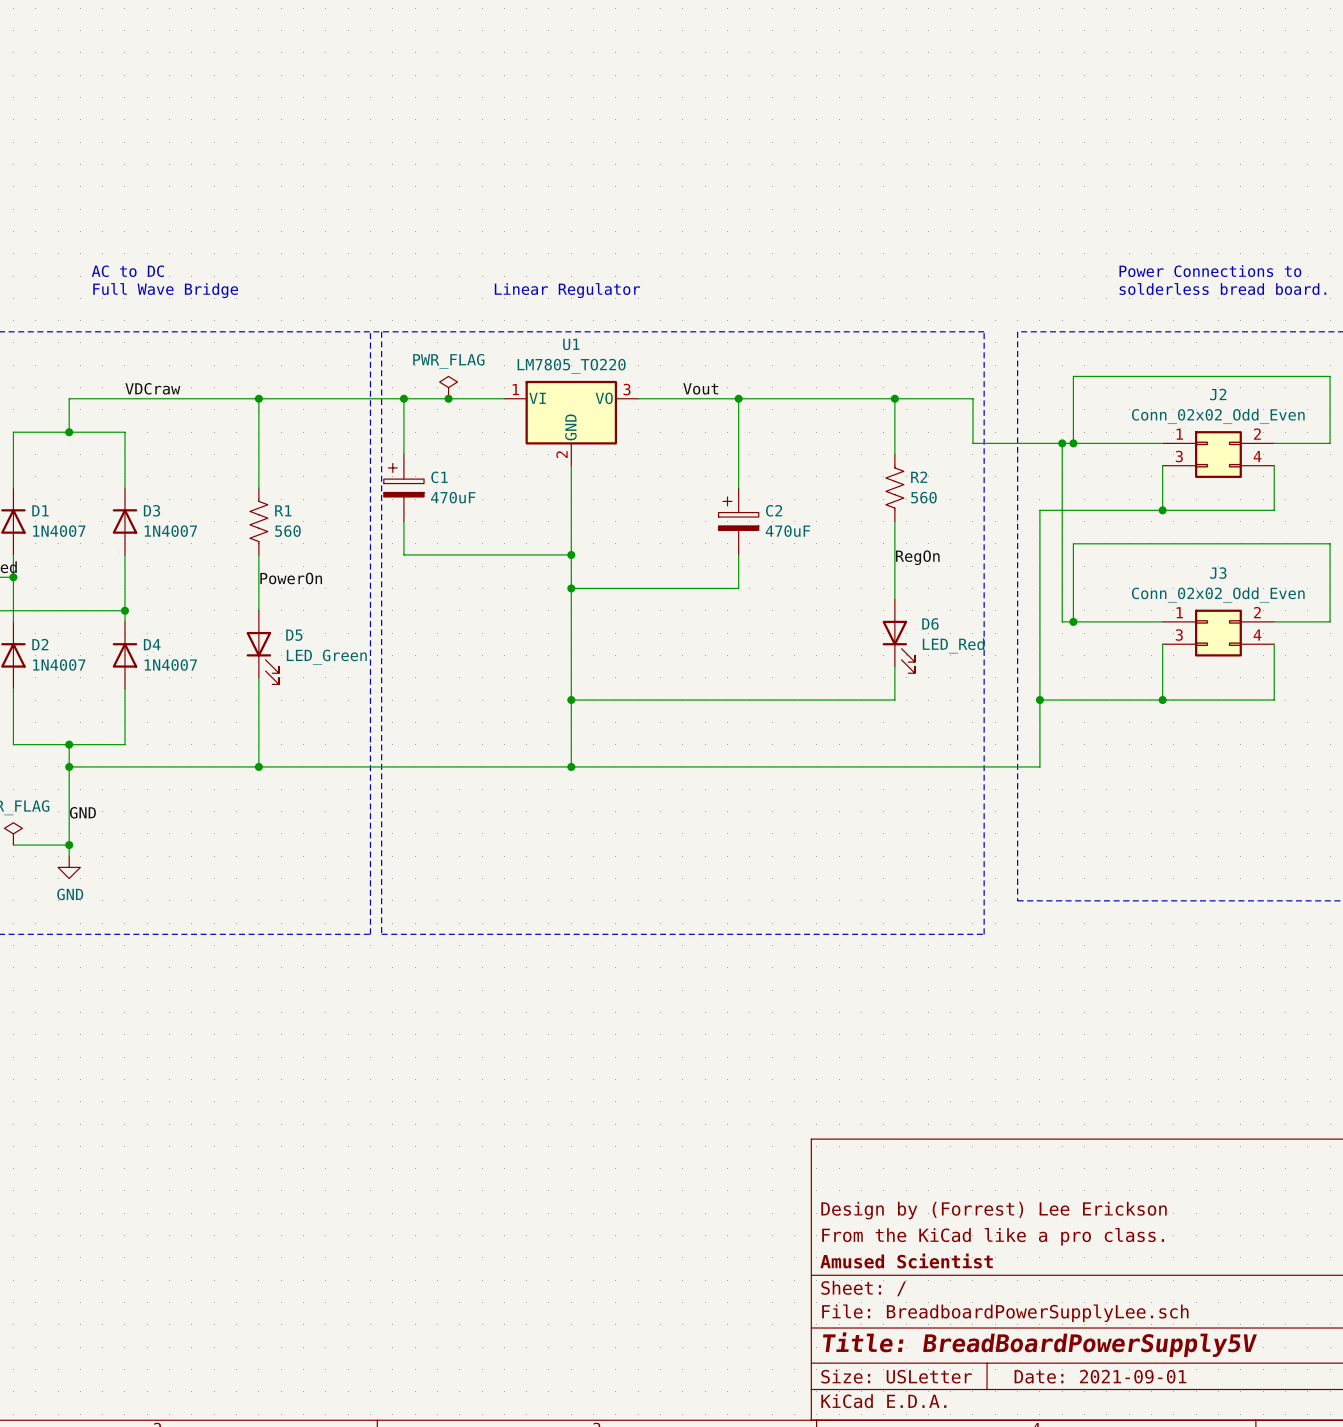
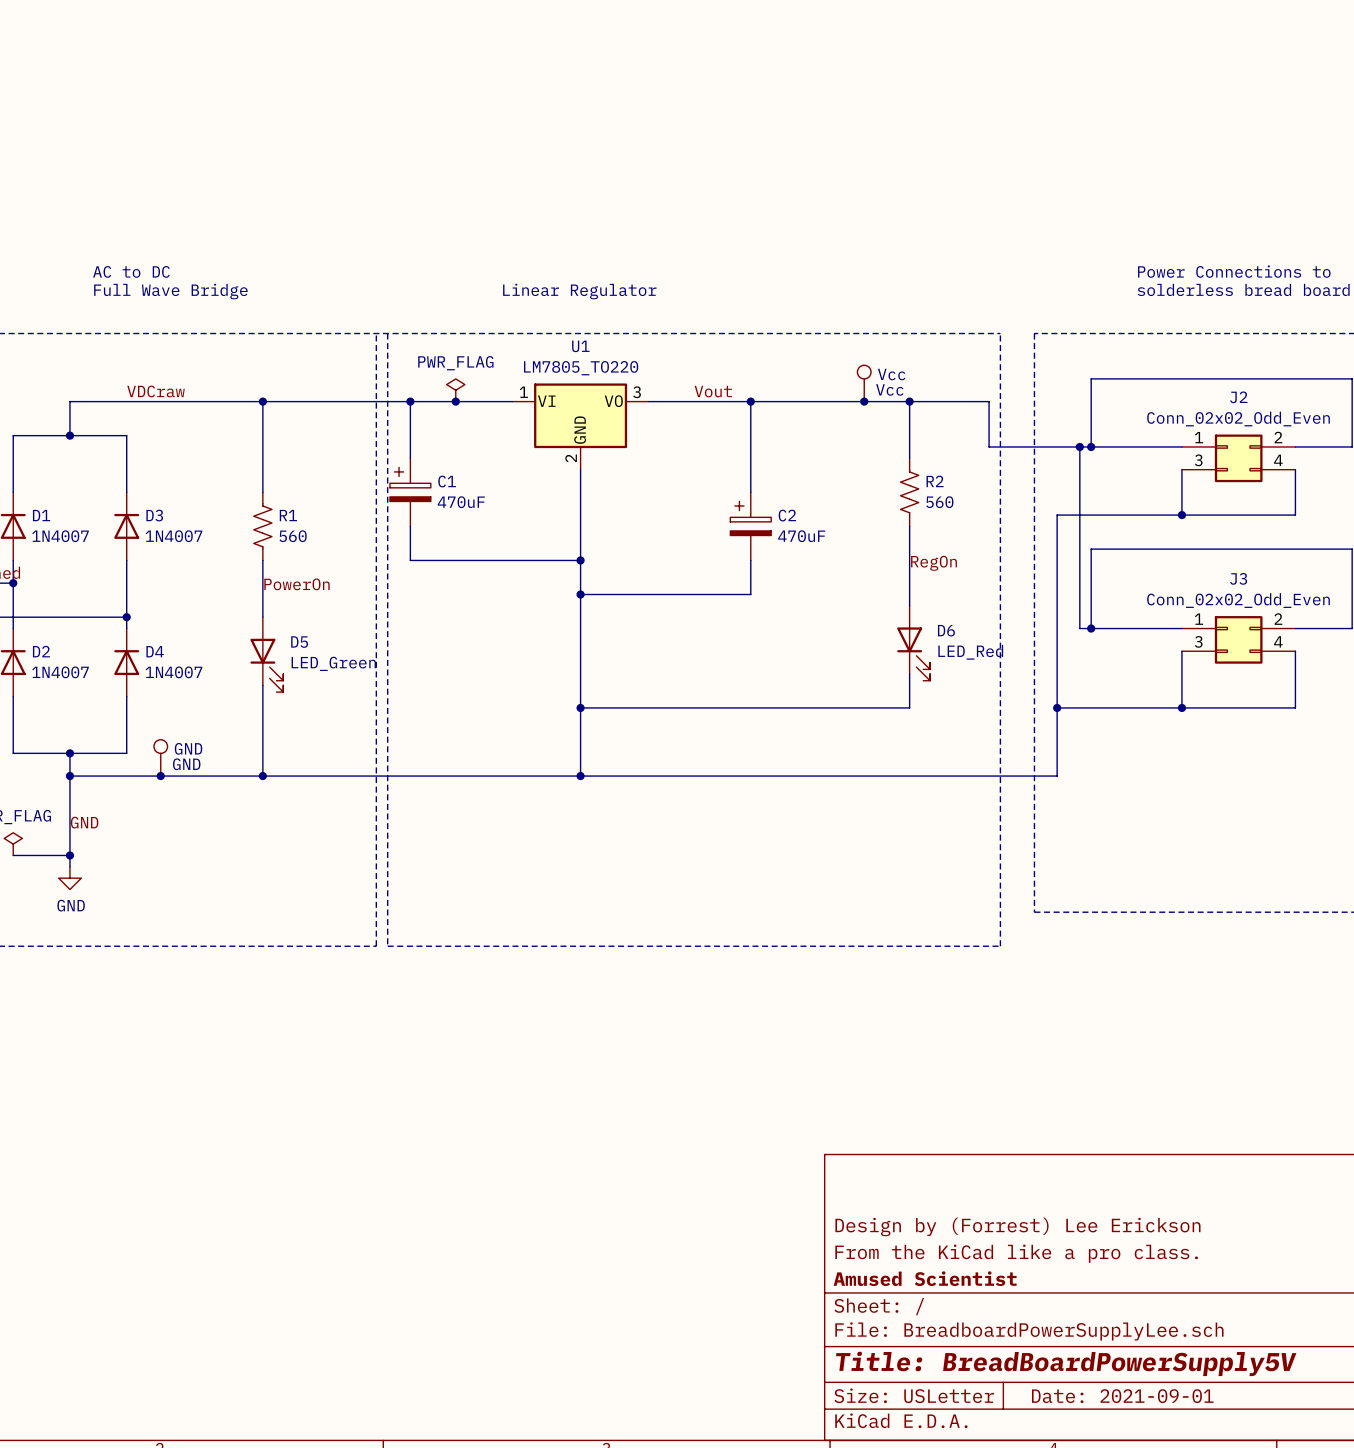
Vcc: none -> Vcc (864, 383)
junction: none -> (864, 401)
GND: none -> GND (160, 757)
junction: none -> (160, 776)

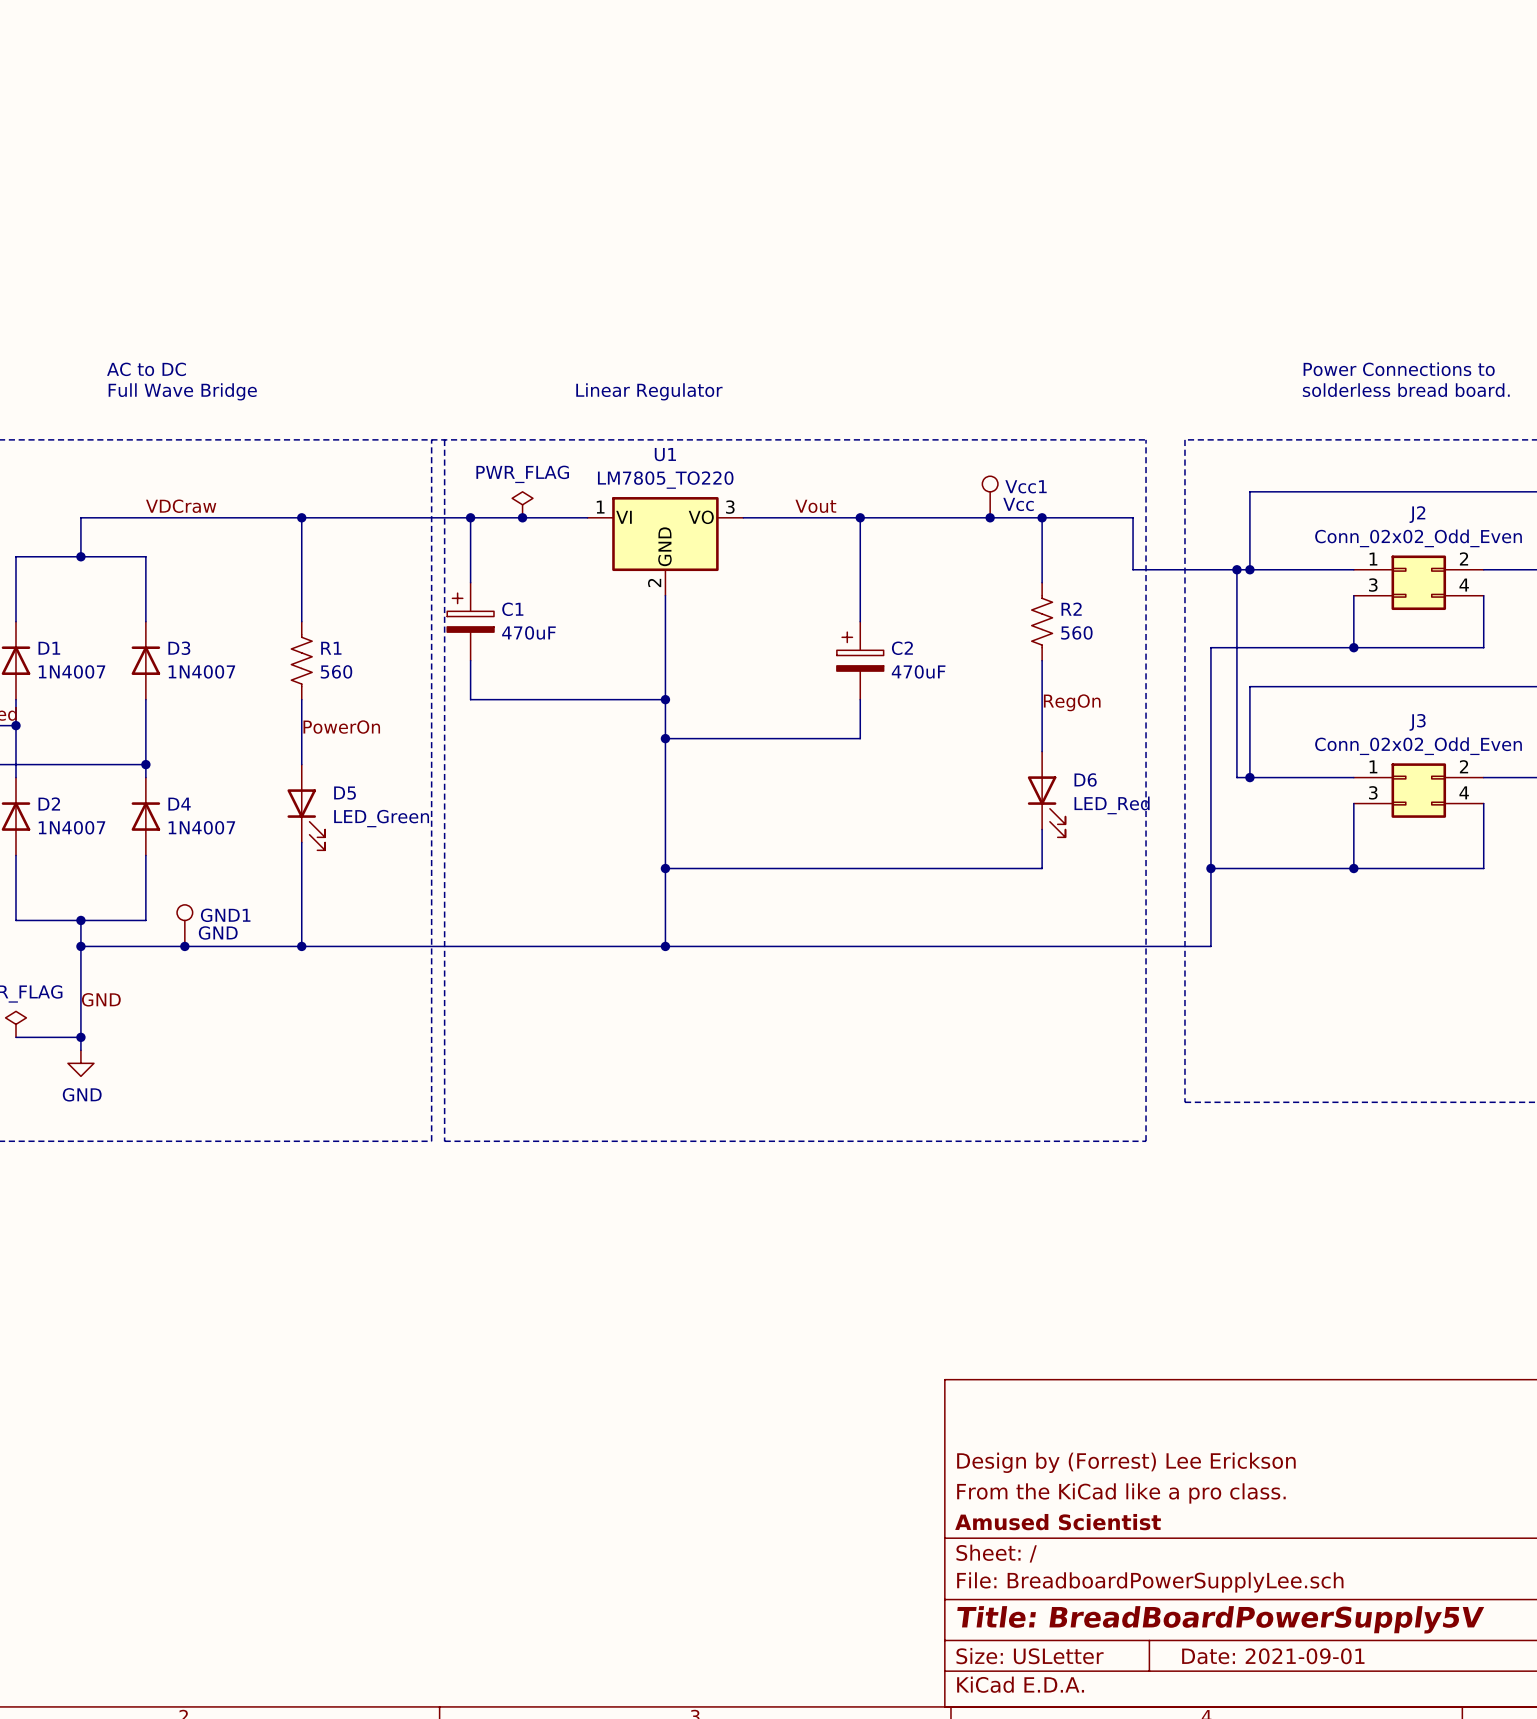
Vcc name: Vcc (891, 374) -> Vcc1 (1026, 486)
GND name: GND (188, 748) -> GND1 (225, 915)

